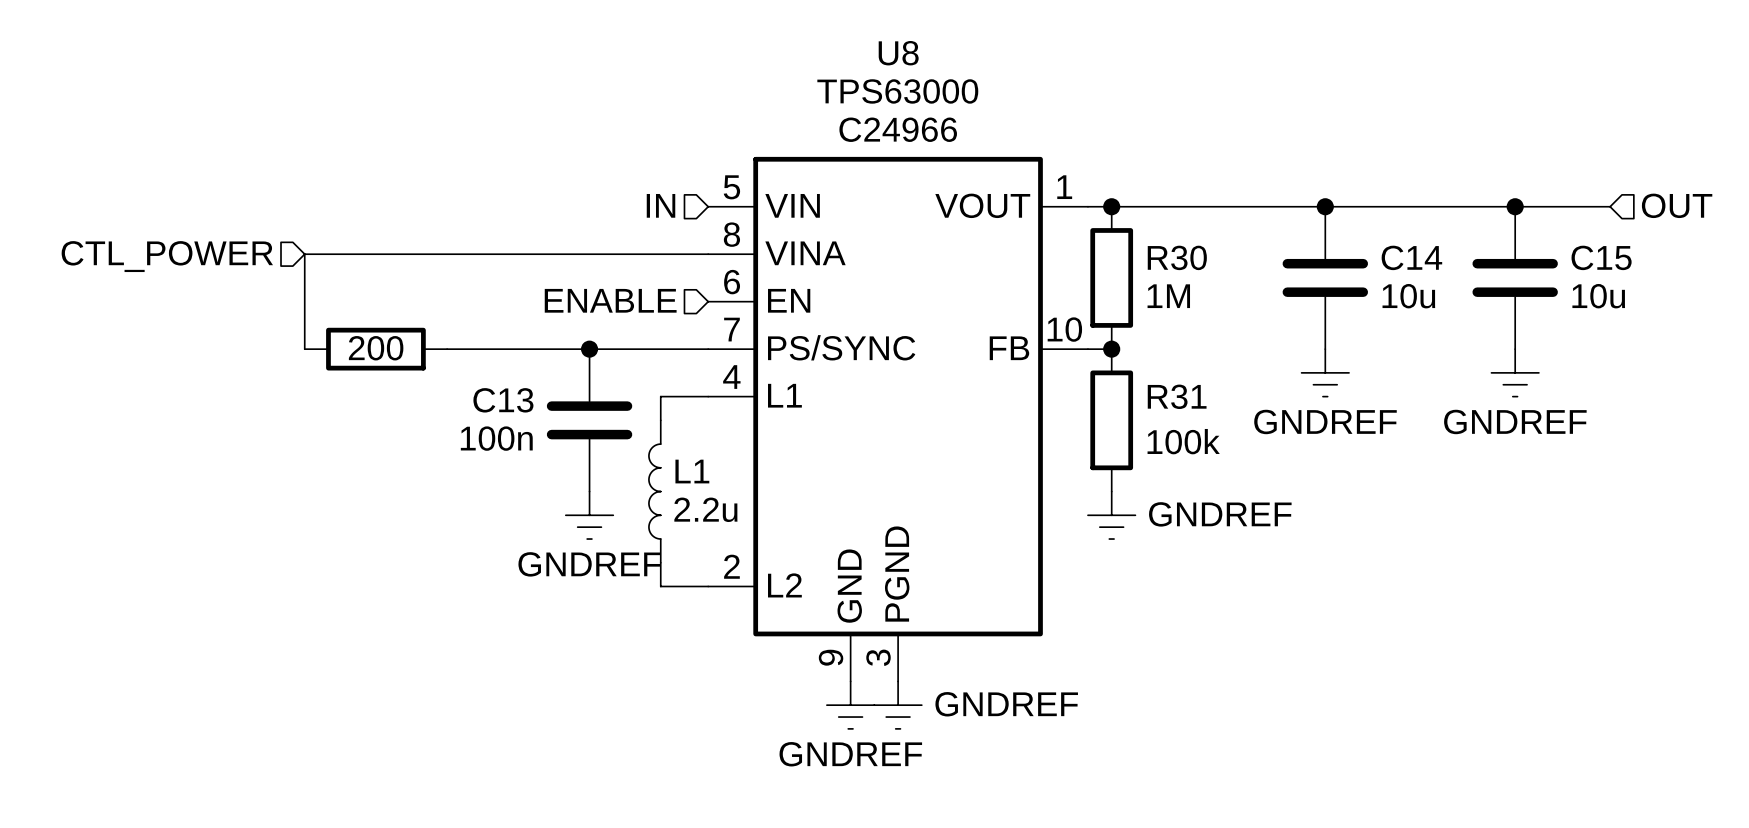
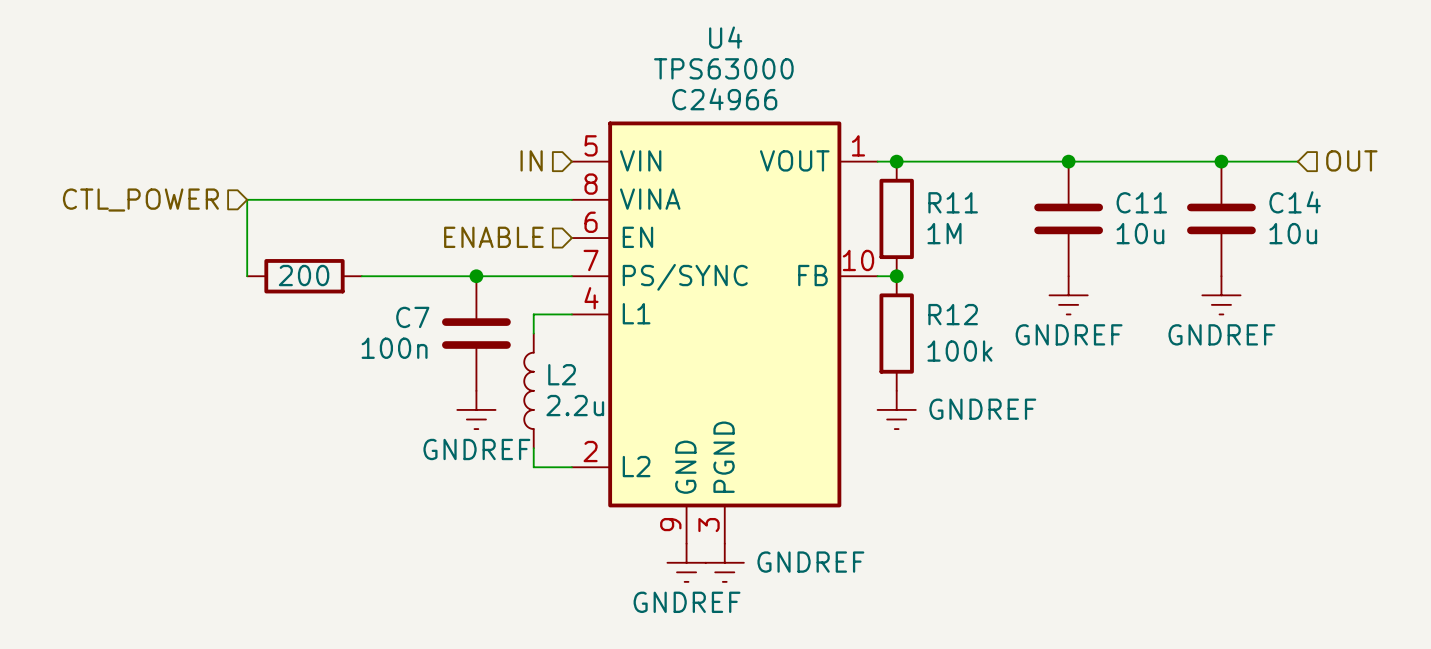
U8 name: U8 (898, 53) -> U4 (725, 37)
R30 name: R30 (1177, 257) -> R11 (953, 202)
C14 name: C14 (1411, 257) -> C11 (1141, 202)
C15 name: C15 (1601, 257) -> C14 (1295, 202)
R31 name: R31 (1177, 396) -> R12 (953, 314)
C13 name: C13 (503, 400) -> C7 (412, 317)
L1 name: L1 (692, 471) -> L2 (562, 374)

